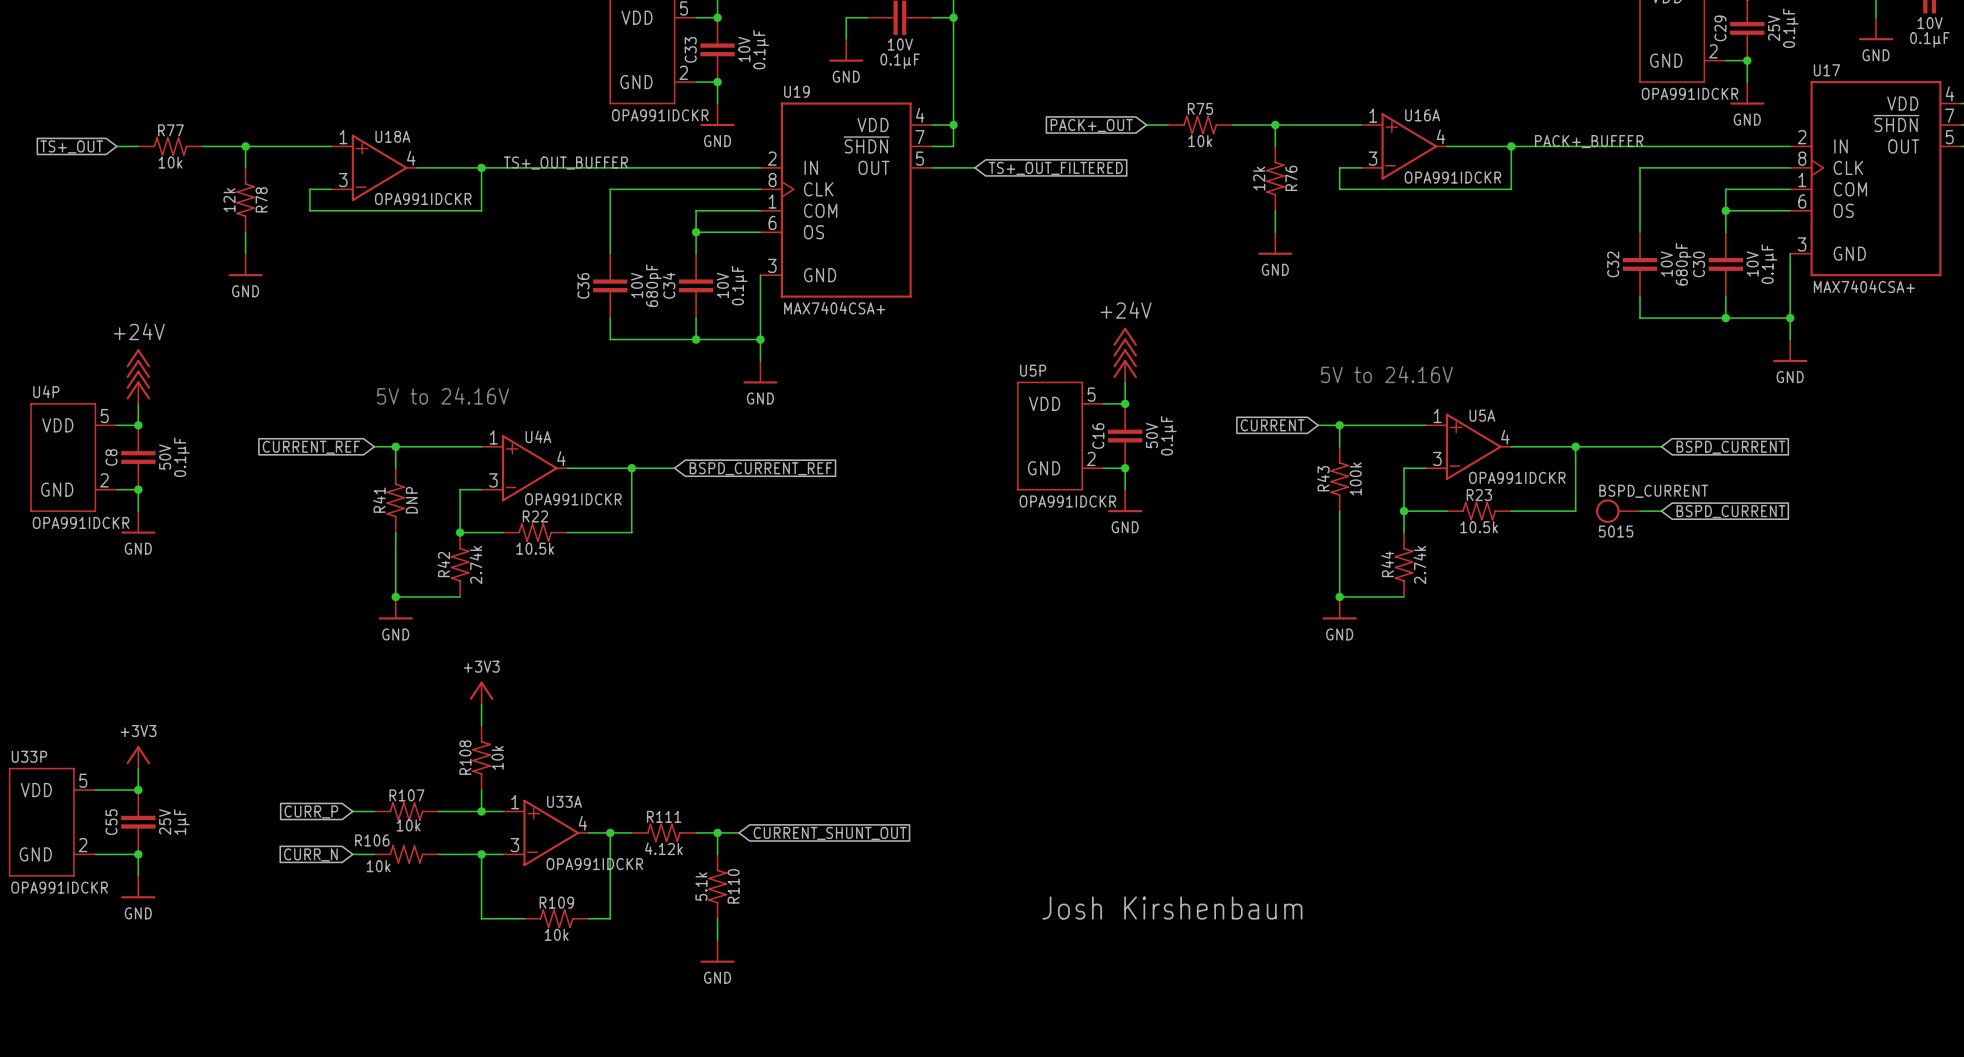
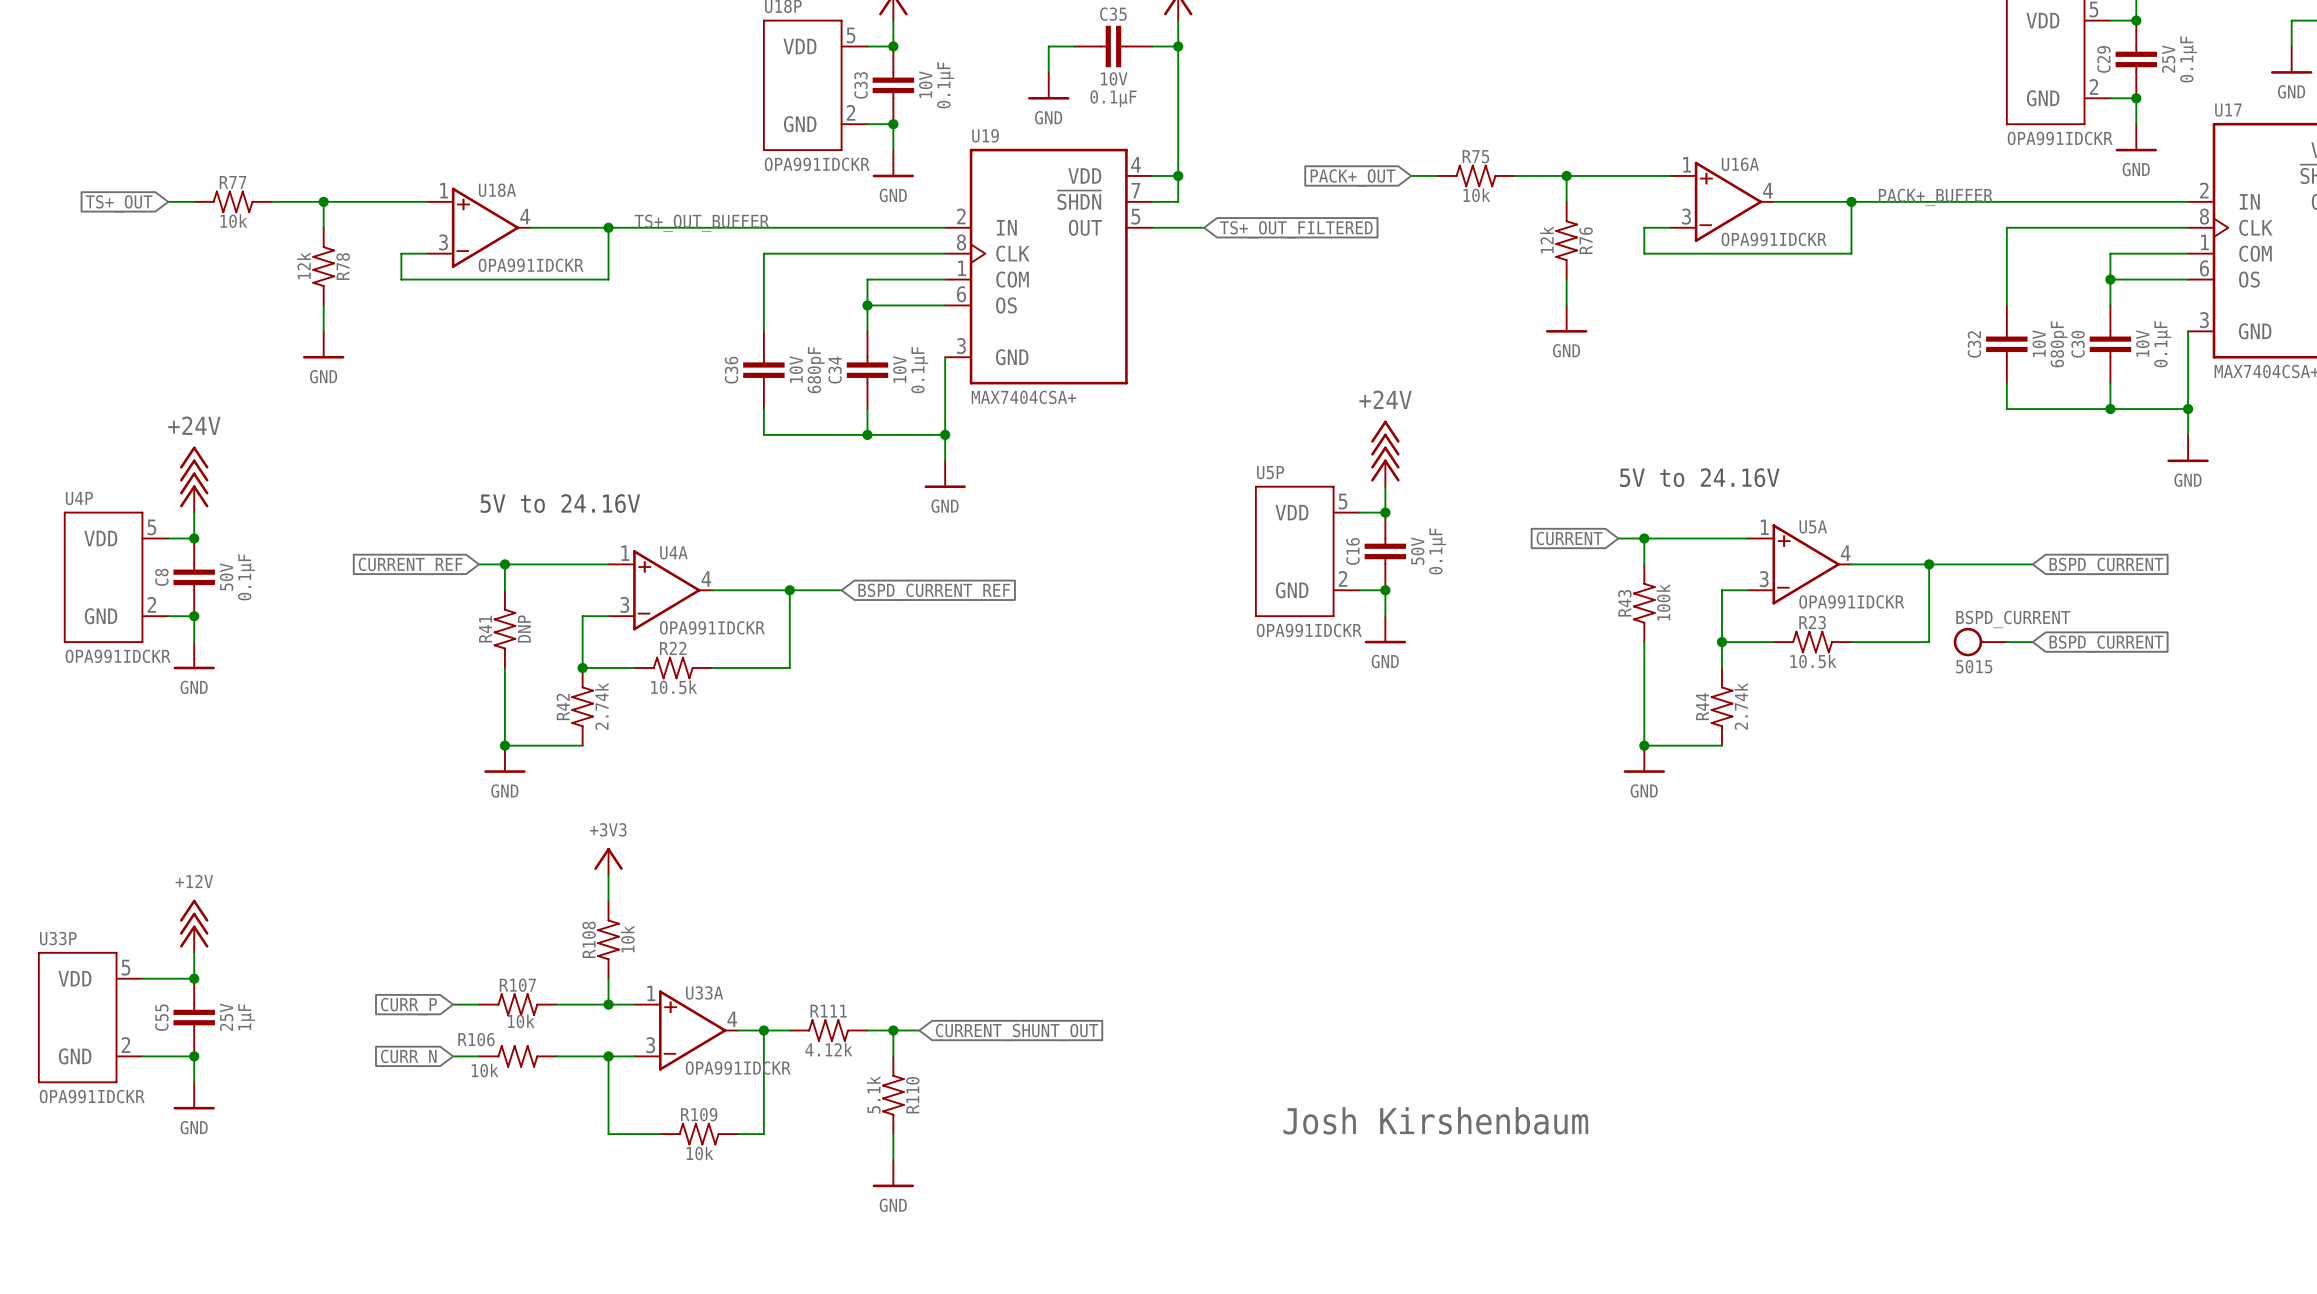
power symbol: none -> +12V (194, 926)
power symbol: +3V3 (138, 757) -> none

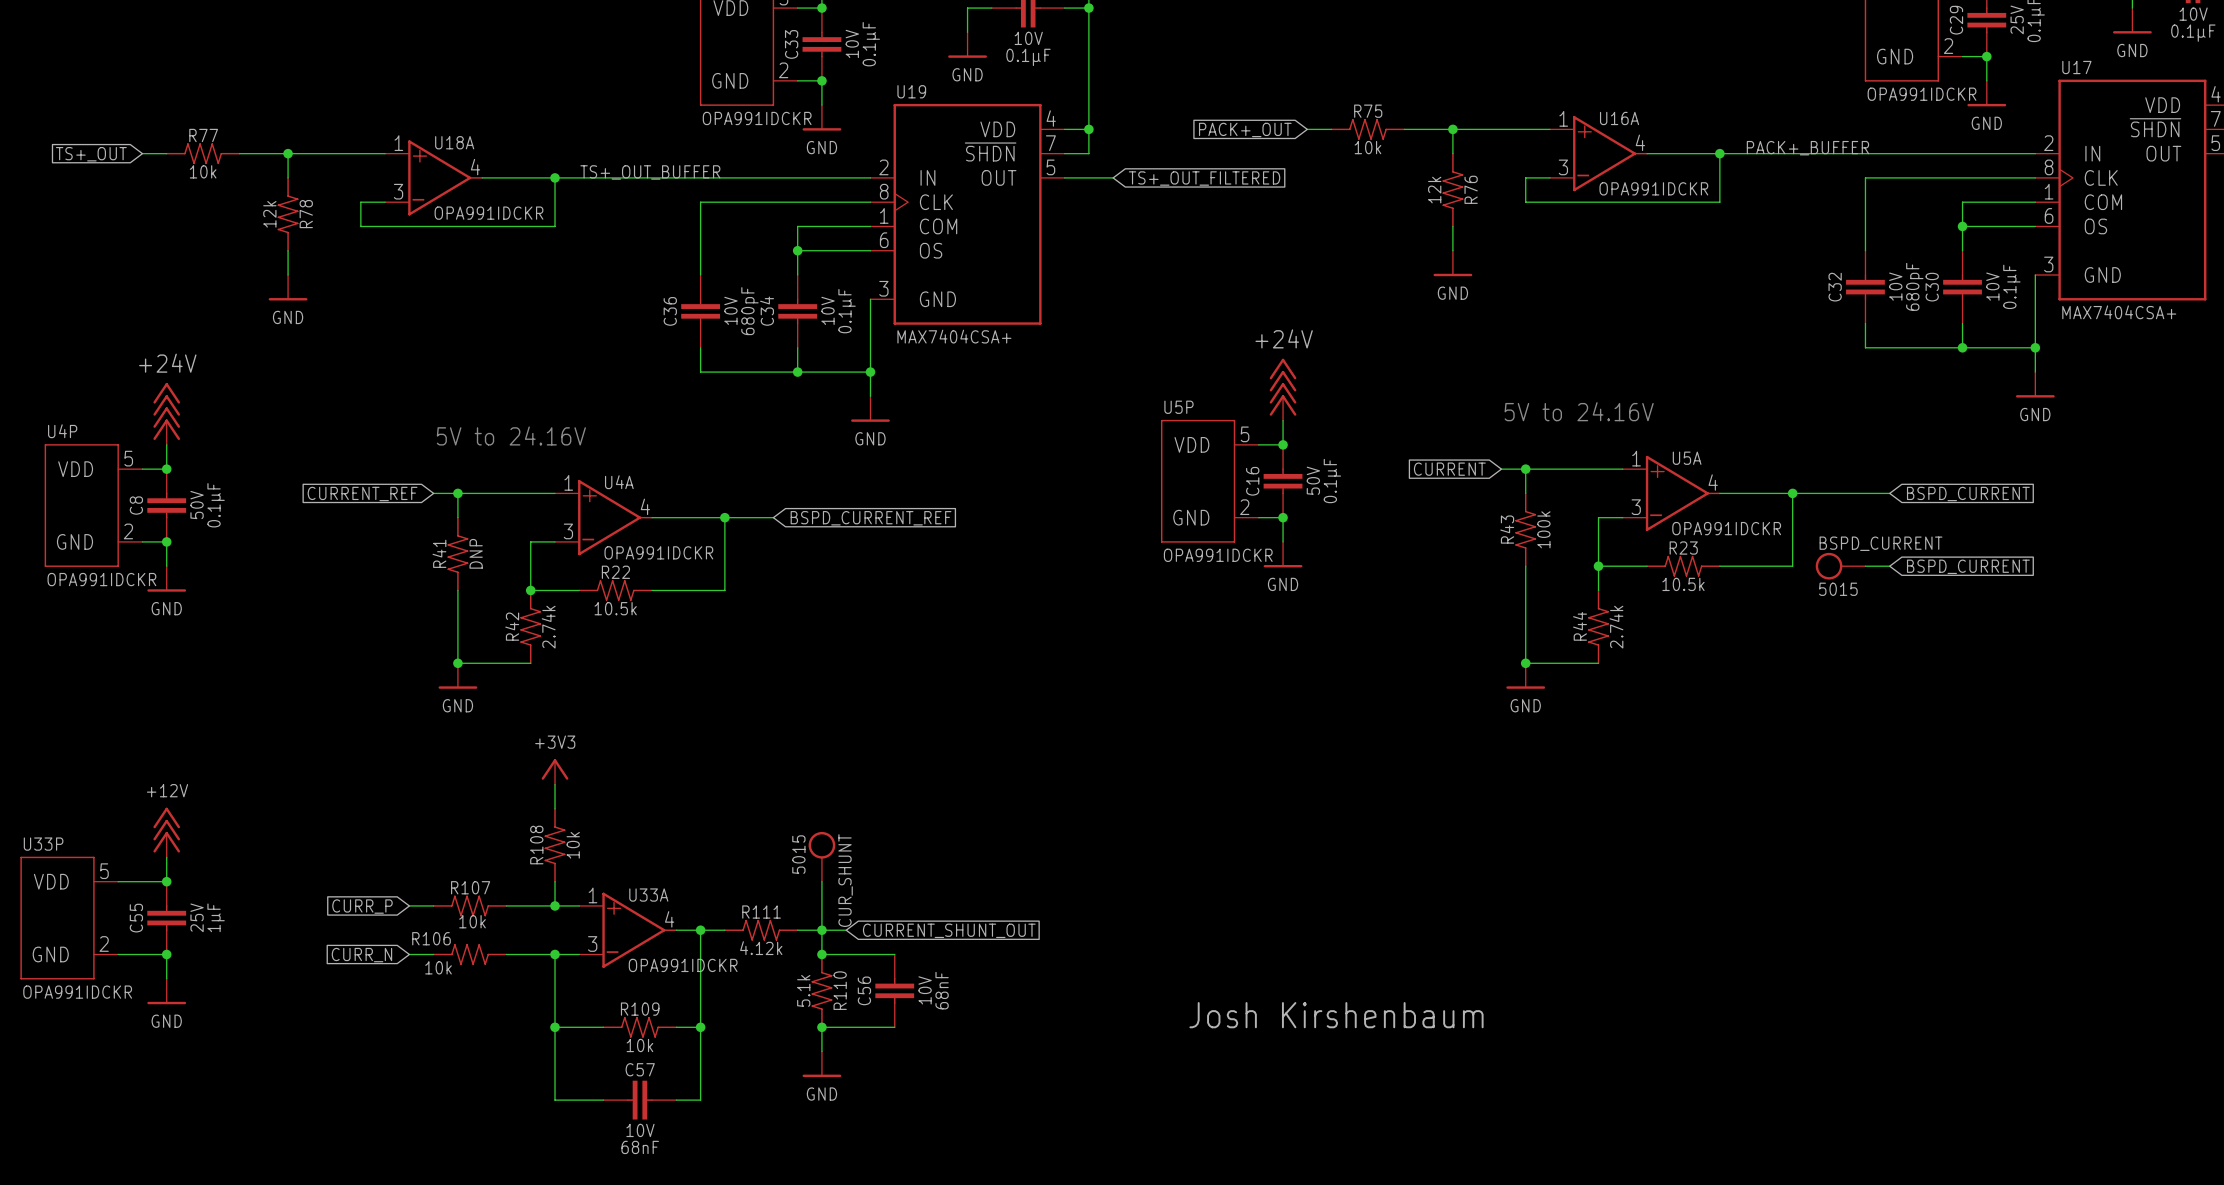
CUR_SHUNT: none -> (821, 856)
wire: none -> (821, 881) (821, 930)
wire: none -> (821, 954) (894, 954)
junction: none -> (821, 954)
C56: none -> (894, 990)
wire: none -> (555, 1027) (555, 1100) (603, 1100)
junction: none -> (555, 1027)
wire: none -> (700, 1027) (700, 1100) (676, 1100)
junction: none -> (700, 1027)
wire: none -> (821, 1027) (894, 1027)
junction: none -> (821, 1027)
C57: none -> (639, 1100)

